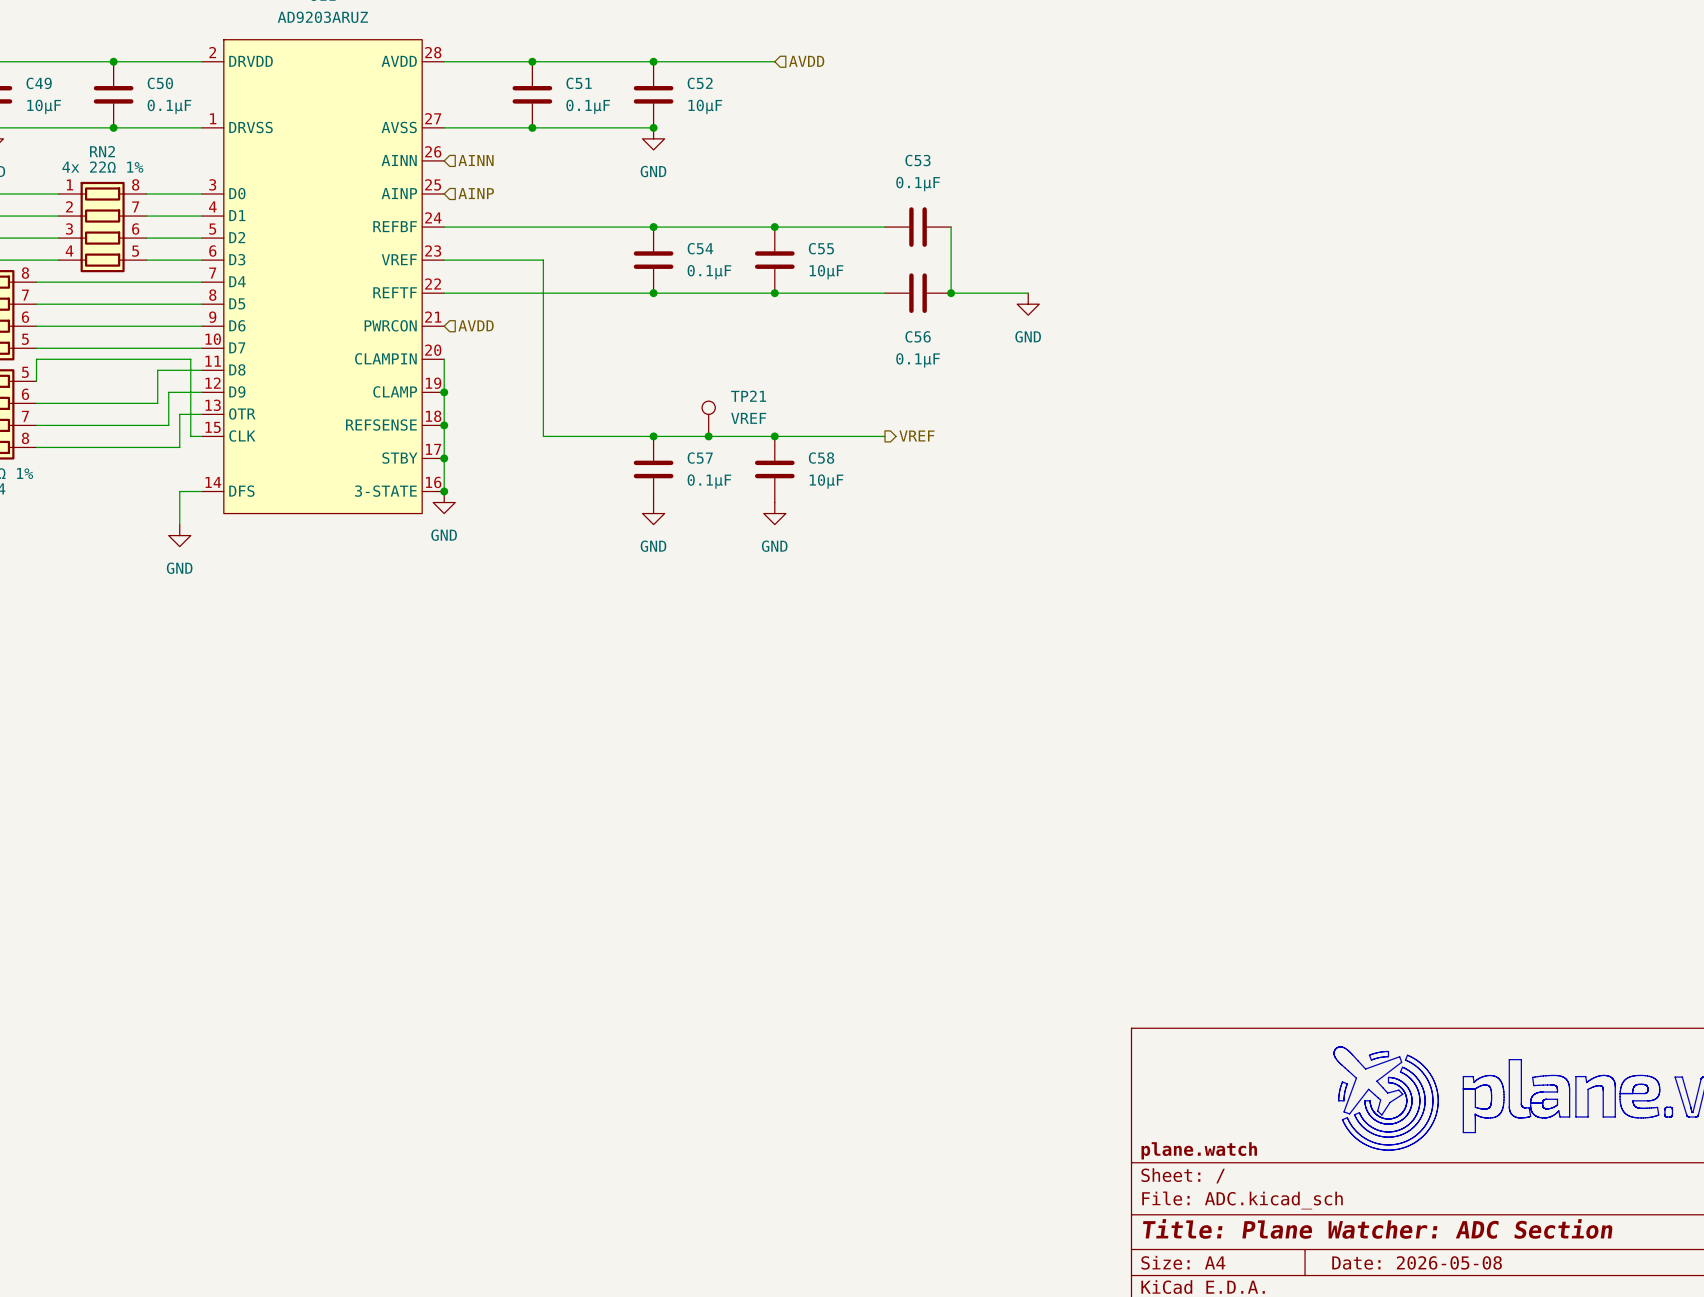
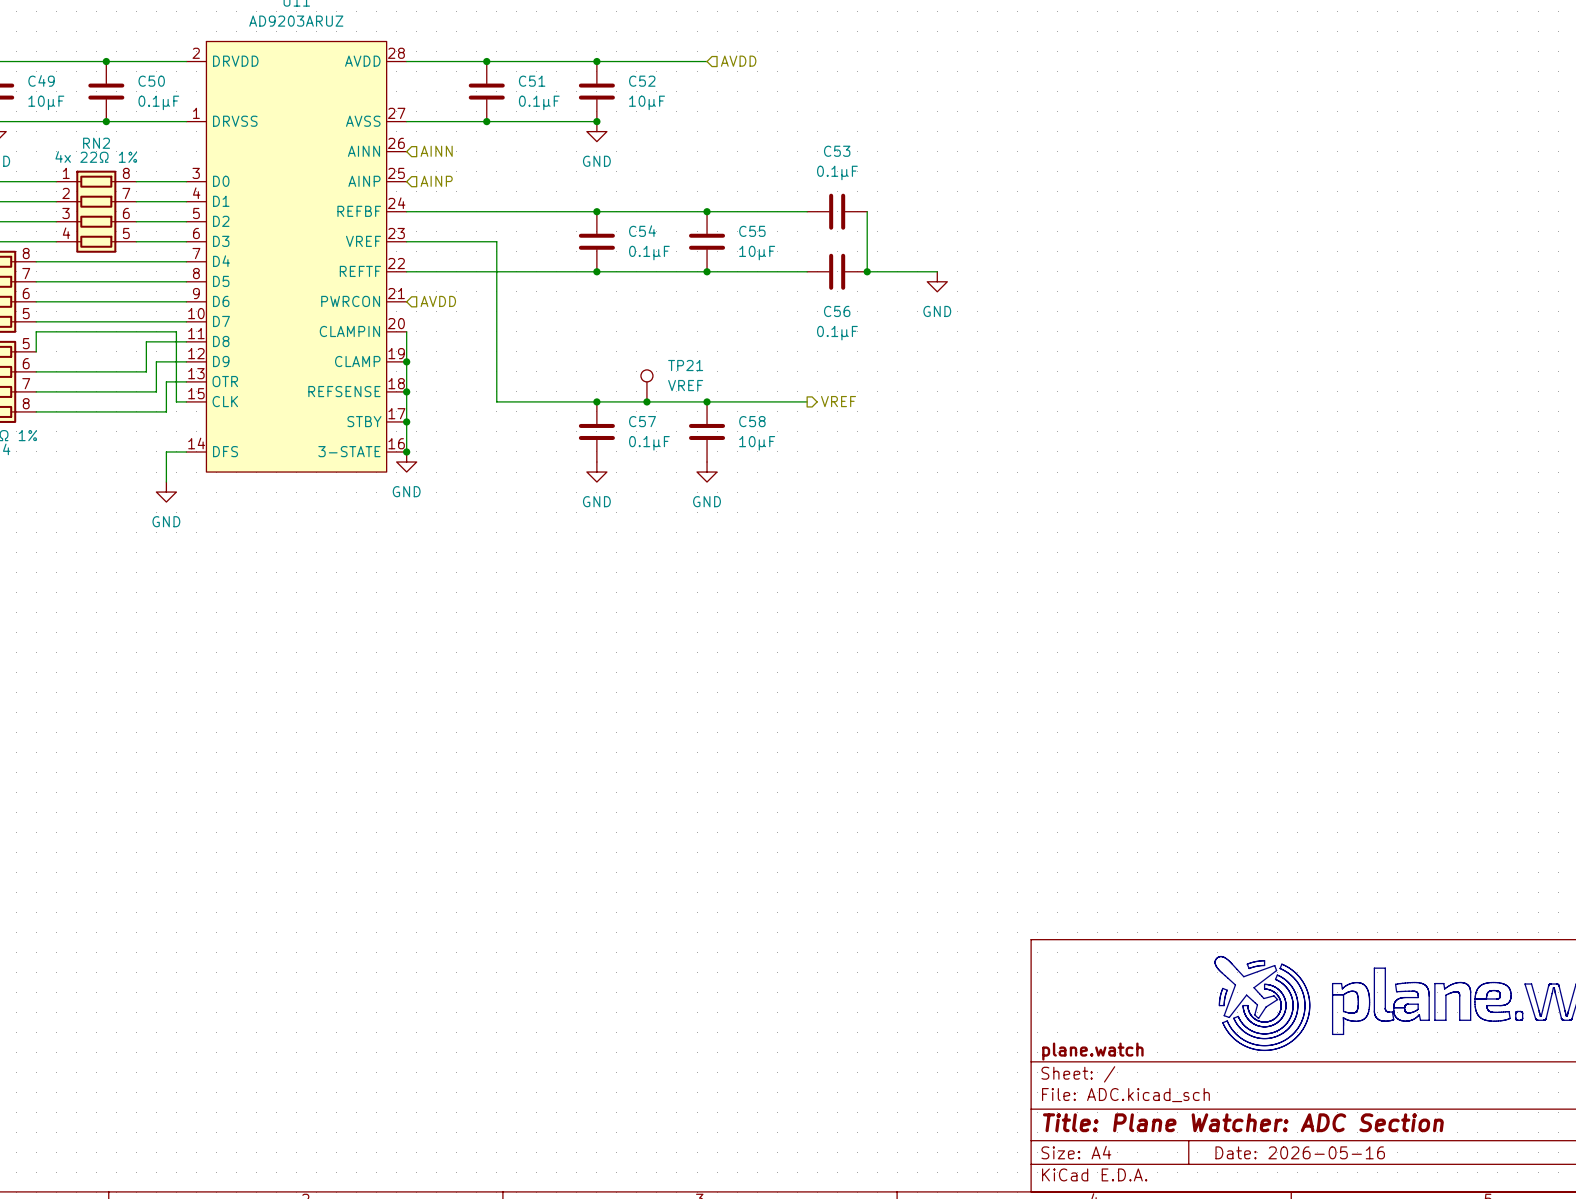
title block: Date: 2026-05-08 (1417, 1262) -> Date: 2026-05-16 (1300, 1152)

